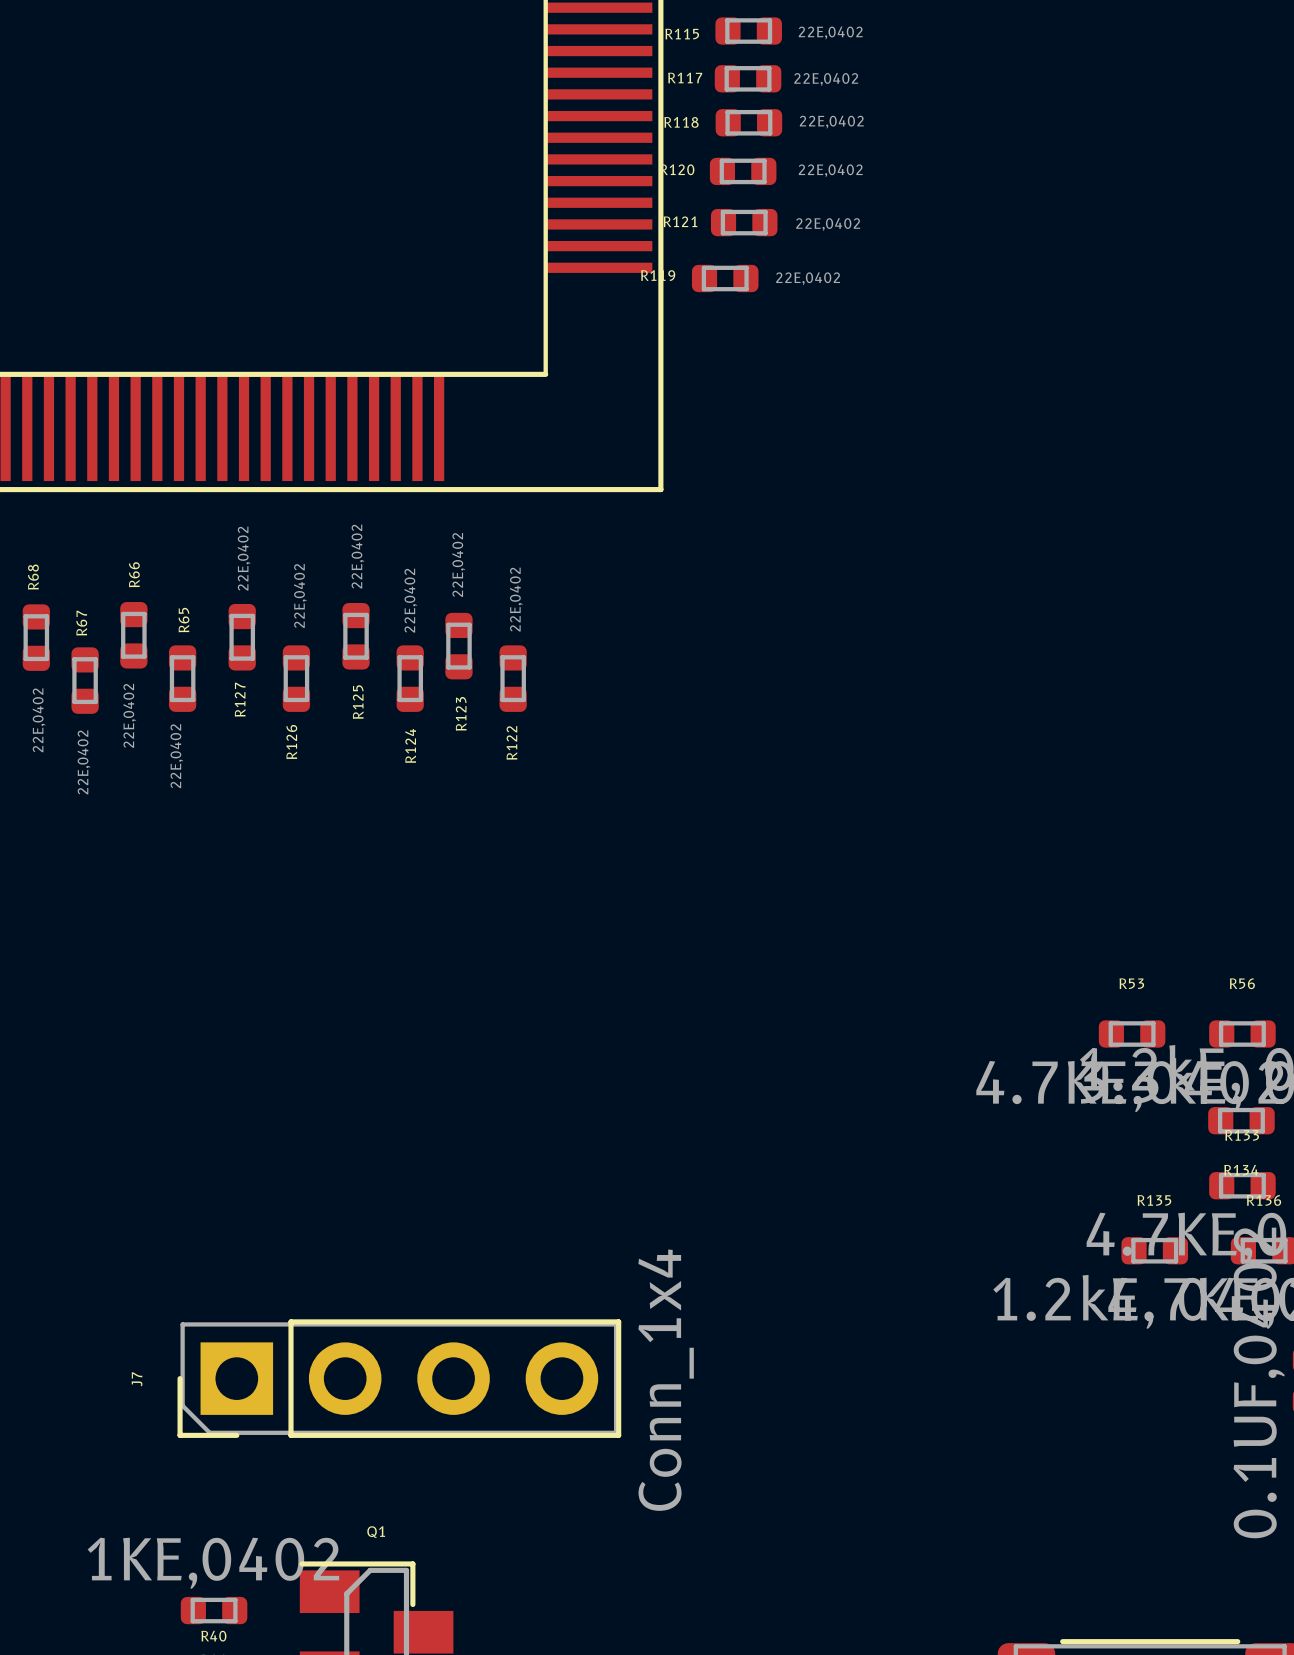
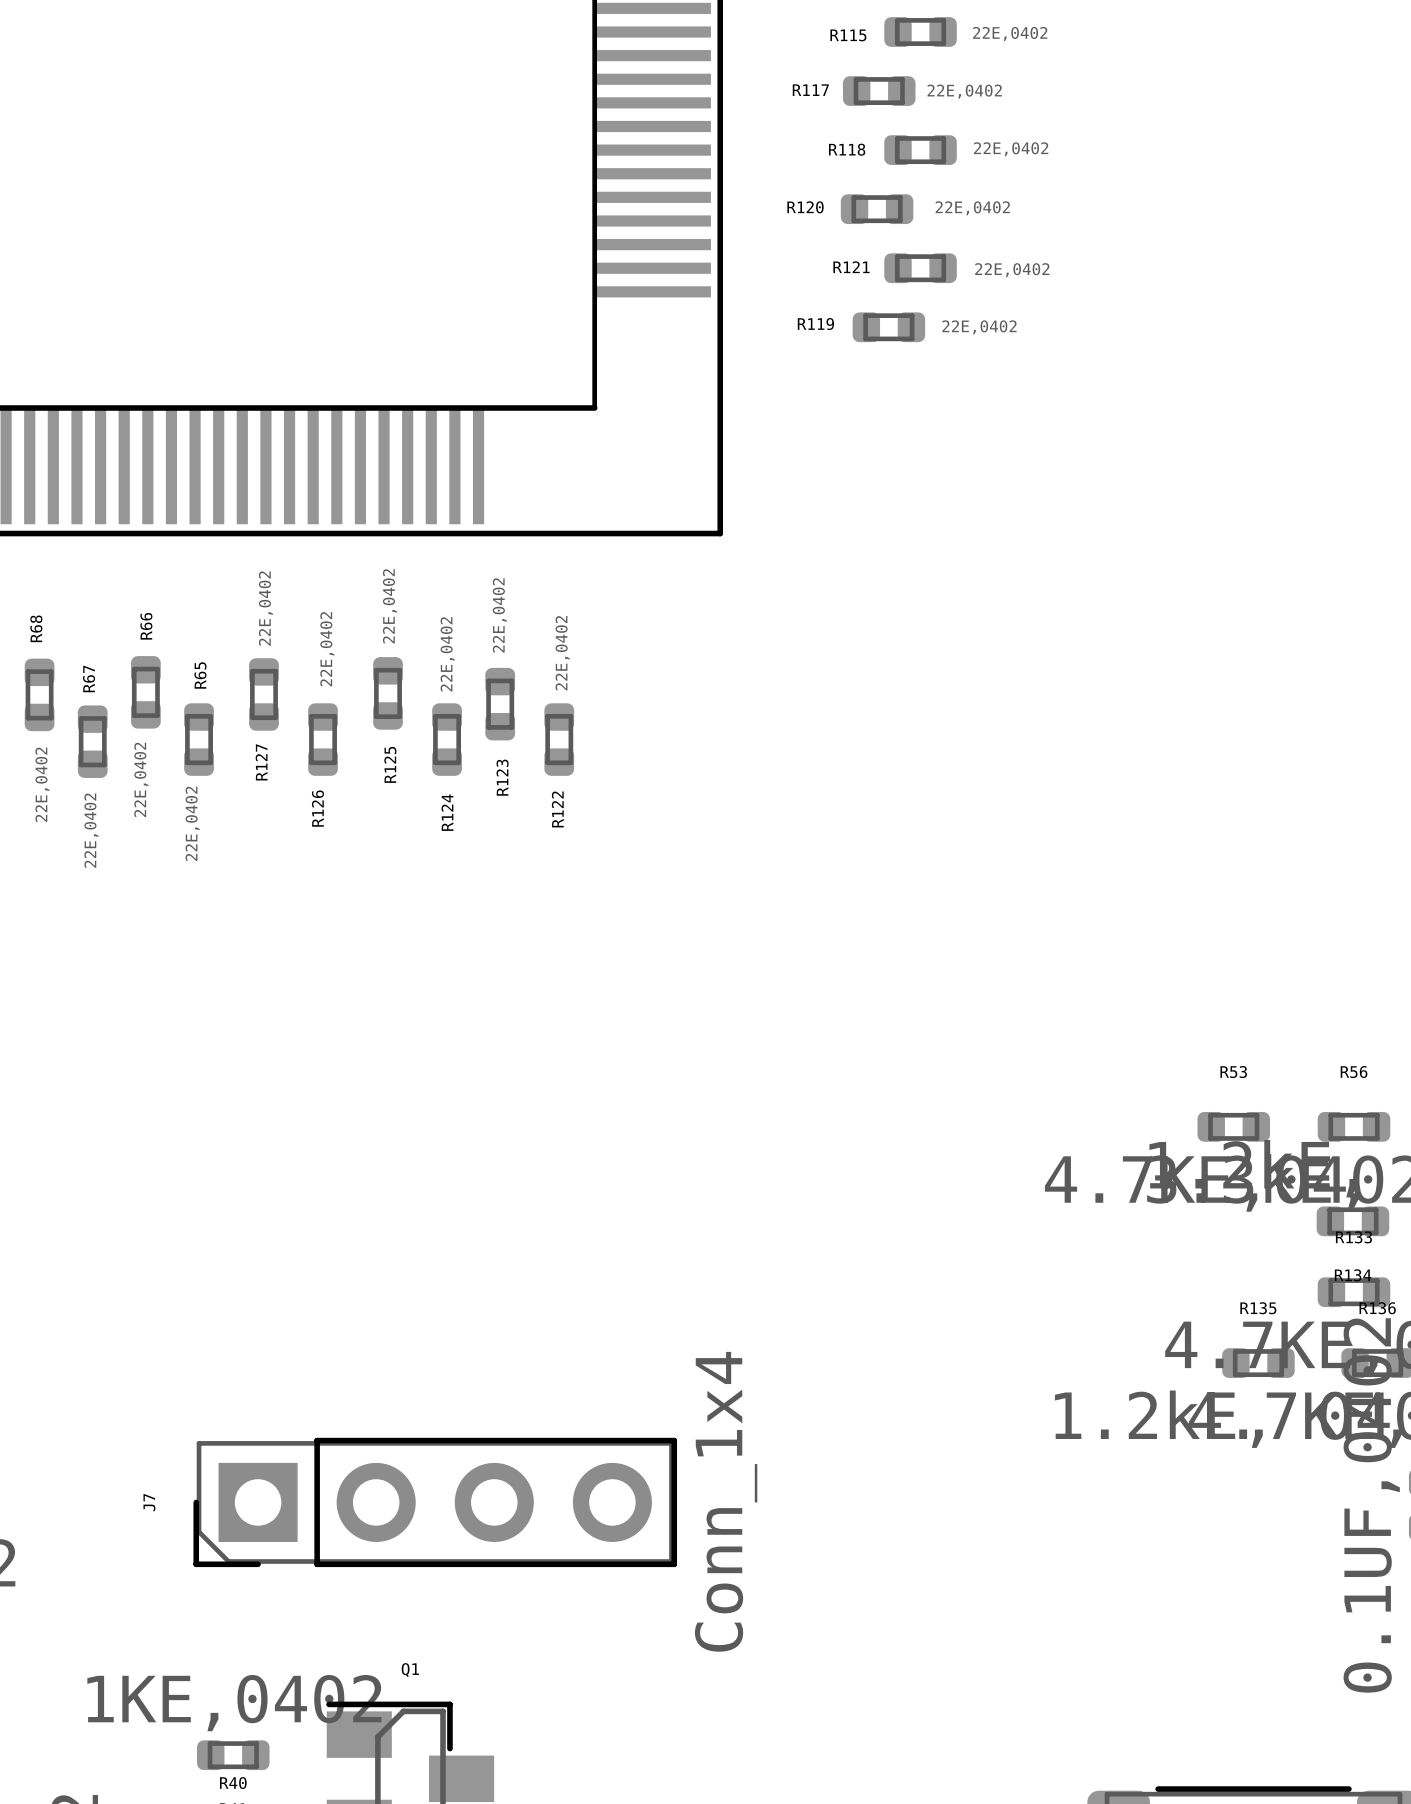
R115 position: (748, 31) -> (920, 32)
R117 position: (748, 78) -> (879, 91)
R118 position: (748, 122) -> (920, 150)
R120 position: (743, 171) -> (877, 209)
R121 position: (744, 222) -> (920, 268)
R119 position: (725, 278) -> (888, 327)

